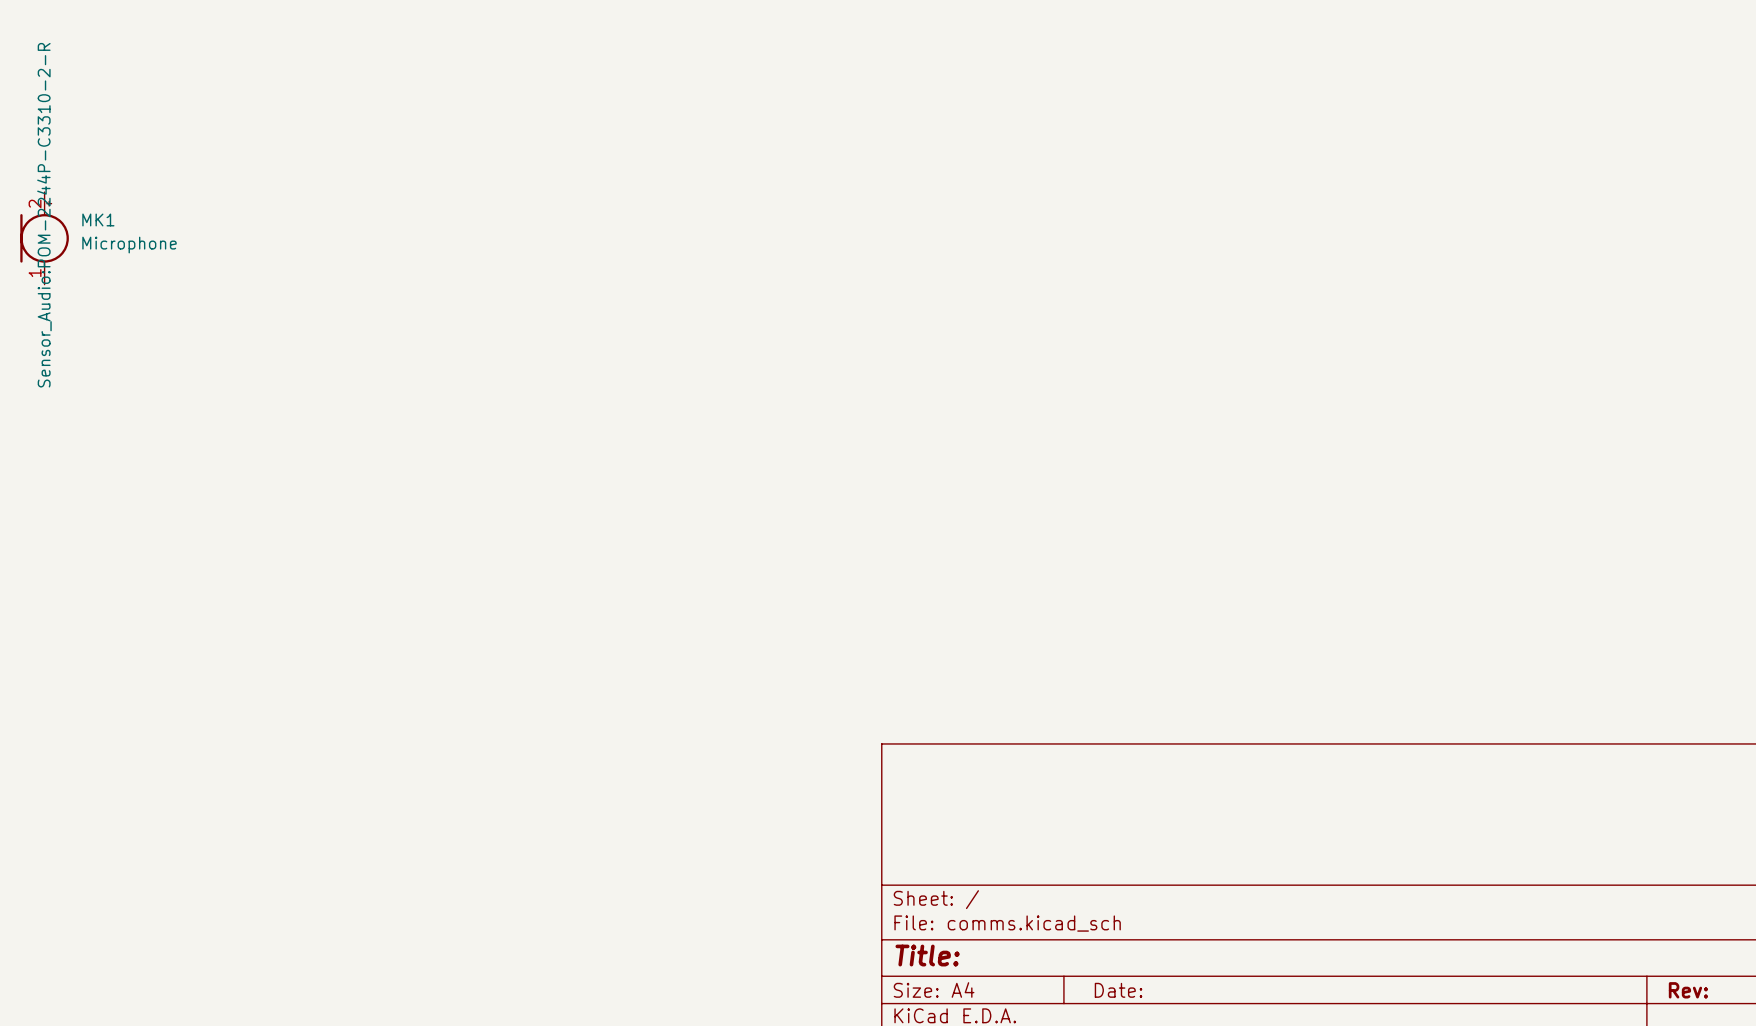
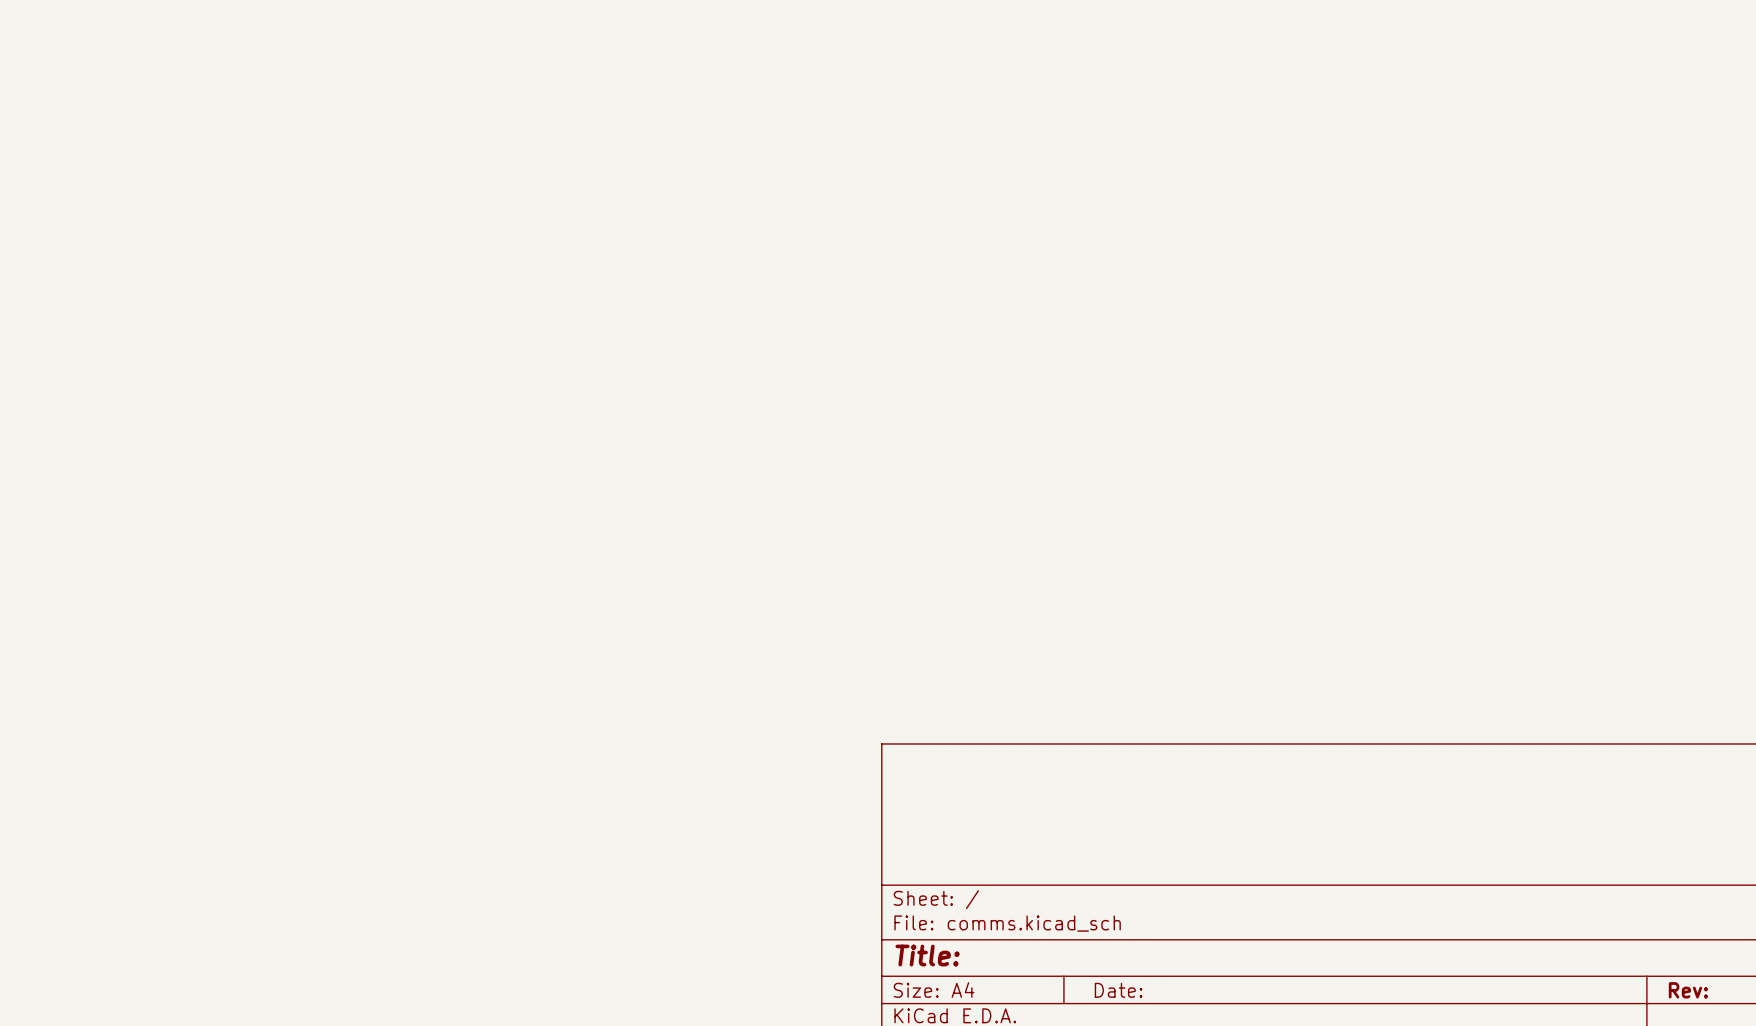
MK1: Microphone (44, 238) -> none

